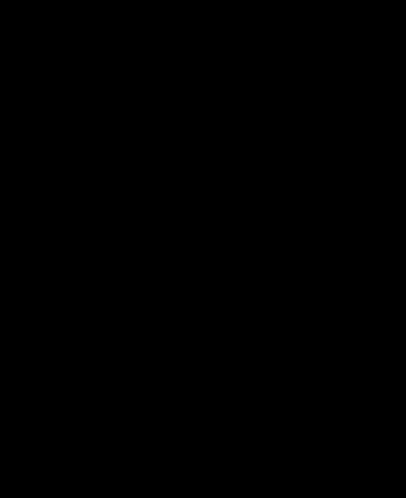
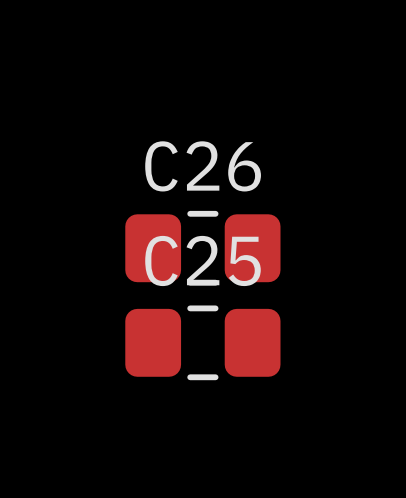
C26: none -> (202, 248)
C25: none -> (202, 342)

